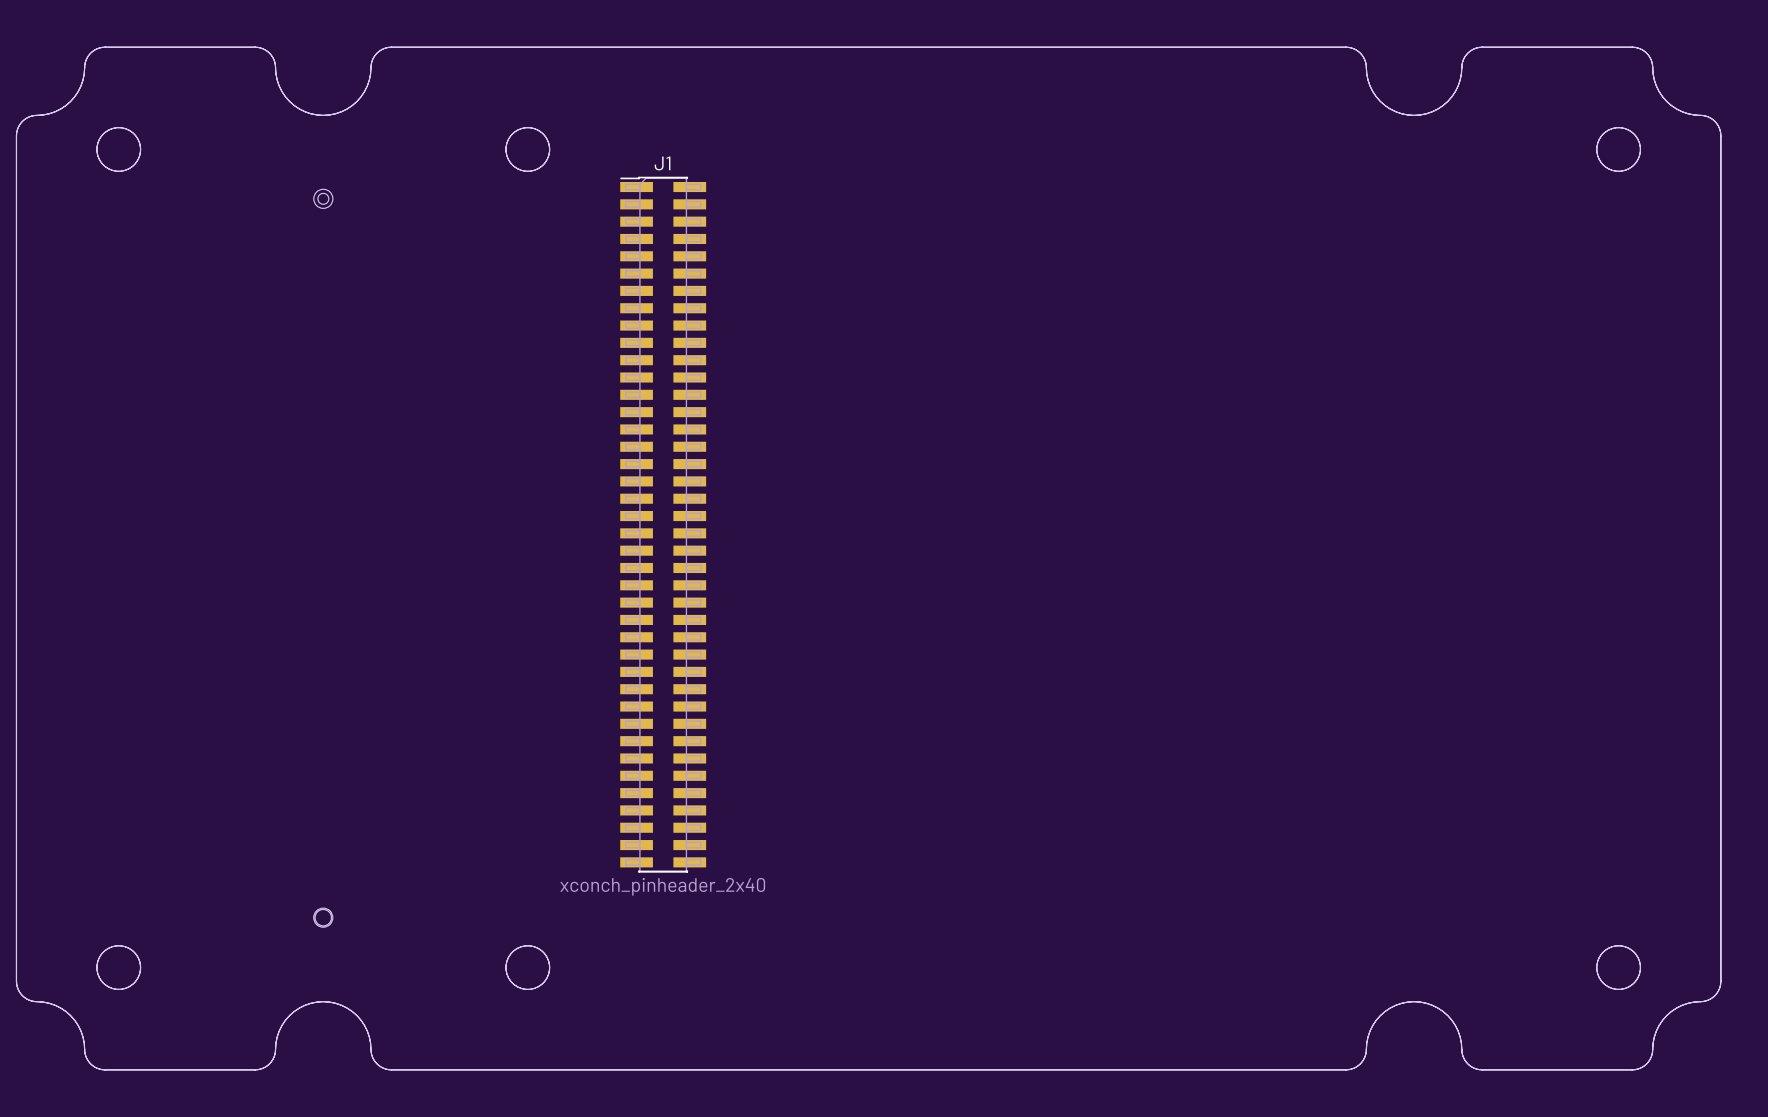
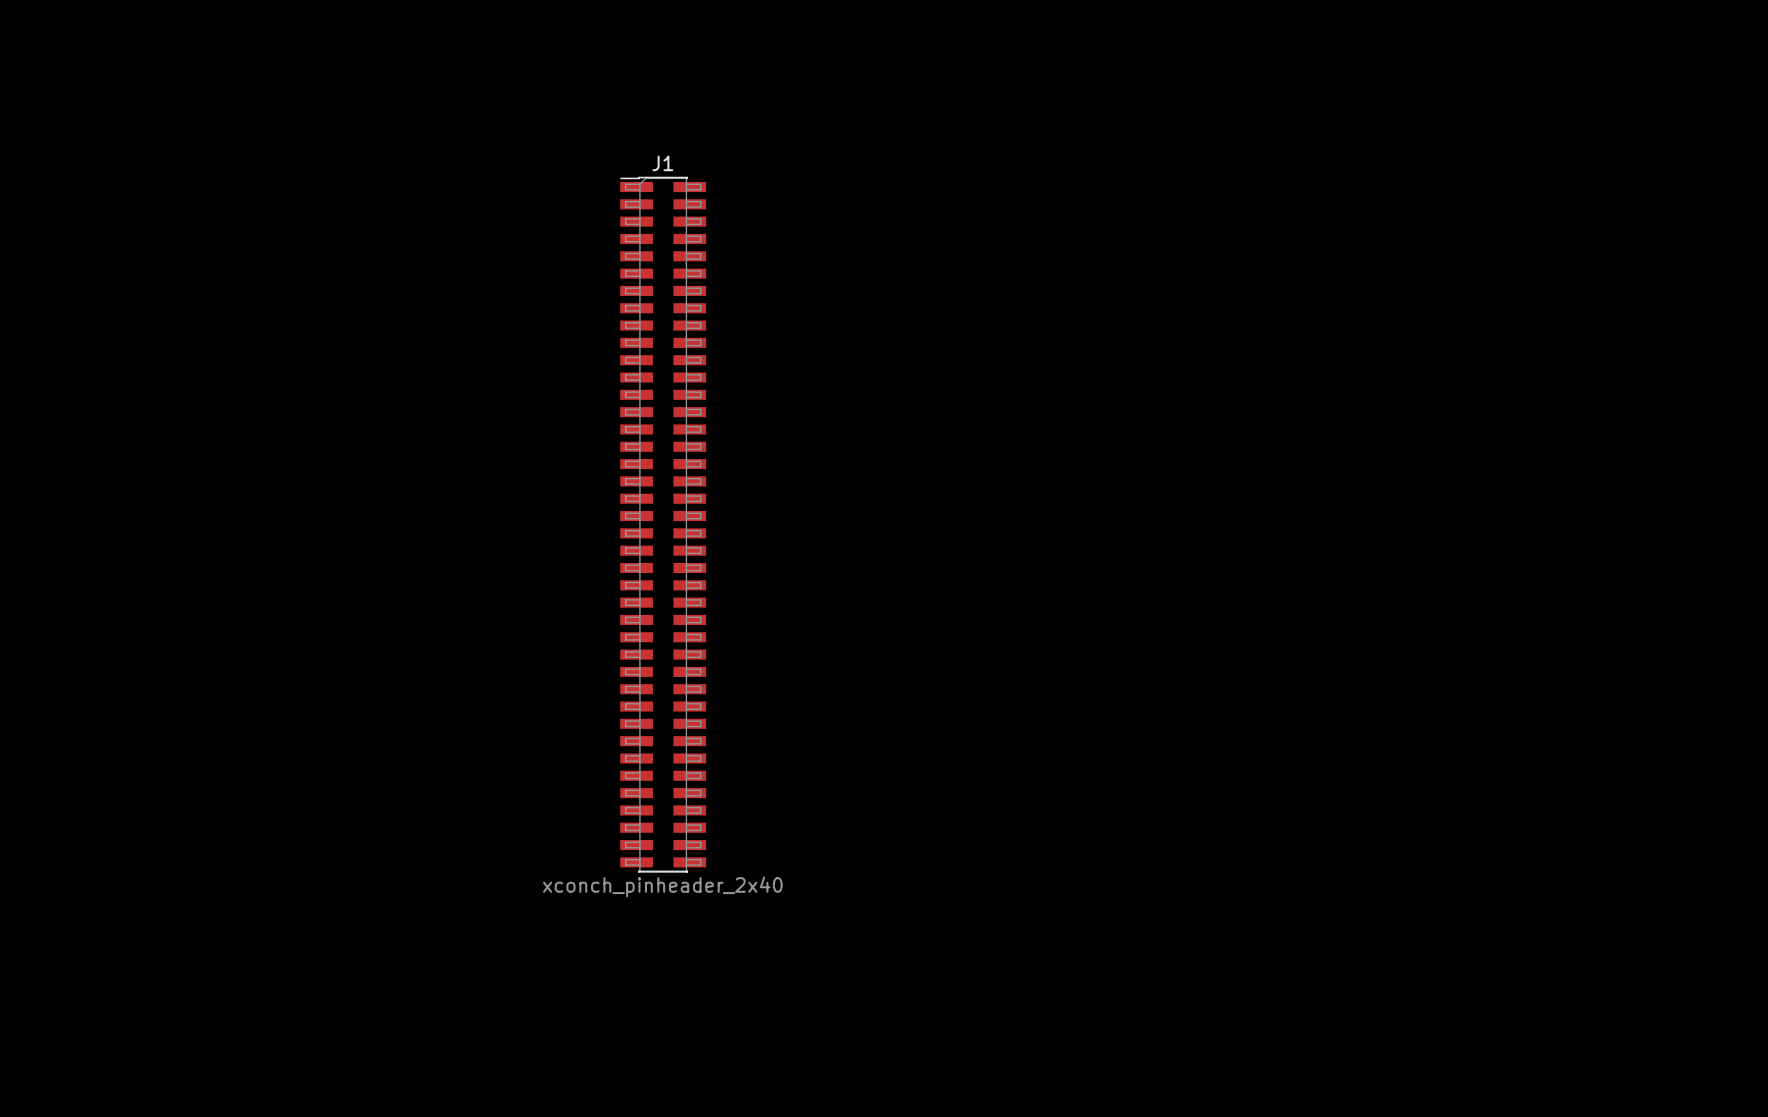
board edge: (105, 47) (255, 47) -> none
board edge: (105, 47) (97, 48) (90, 53) (86, 59) (84, 67) -> none
board edge: (105, 47) (97, 48) (90, 53) (86, 59) (84, 67) -> none
board edge: (255, 47) (262, 48) (269, 53) (273, 59) (275, 67) -> none
board edge: (255, 47) (262, 48) (269, 53) (273, 59) (275, 67) -> none
board edge: (391, 47) (1345, 47) -> none
board edge: (391, 47) (383, 48) (376, 53) (372, 59) (370, 67) -> none
board edge: (391, 47) (383, 48) (376, 53) (372, 59) (370, 67) -> none
board edge: (1345, 47) (1353, 48) (1360, 53) (1364, 59) (1366, 67) -> none
board edge: (1345, 47) (1353, 48) (1360, 53) (1364, 59) (1366, 67) -> none
board edge: (1482, 47) (1632, 47) -> none
board edge: (1482, 47) (1474, 48) (1467, 53) (1463, 59) (1461, 67) -> none
board edge: (1482, 47) (1474, 48) (1467, 53) (1463, 59) (1461, 67) -> none
board edge: (1632, 47) (1640, 48) (1646, 53) (1651, 59) (1652, 67) -> none
board edge: (1632, 47) (1640, 48) (1646, 53) (1651, 59) (1652, 67) -> none
board edge: (84, 67) (81, 85) (70, 101) (55, 111) (36, 115) -> none
board edge: (84, 67) (81, 85) (70, 101) (55, 111) (36, 115) -> none
board edge: (275, 67) (279, 85) (289, 101) (305, 111) (323, 115) (341, 111) (357, 101) (367, 85) (370, 67) -> none
board edge: (275, 67) (279, 85) (289, 101) (305, 111) (323, 115) (341, 111) (357, 101) (367, 85) (370, 67) -> none
board edge: (1366, 67) (1369, 85) (1380, 101) (1395, 111) (1414, 115) (1432, 111) (1447, 101) (1458, 85) (1461, 67) -> none
board edge: (1366, 67) (1369, 85) (1380, 101) (1395, 111) (1414, 115) (1432, 111) (1447, 101) (1458, 85) (1461, 67) -> none
board edge: (1652, 67) (1656, 85) (1666, 101) (1682, 111) (1700, 115) -> none
board edge: (1652, 67) (1656, 85) (1666, 101) (1682, 111) (1700, 115) -> none
board edge: (36, 115) (29, 116) (22, 121) (18, 128) (16, 135) -> none
board edge: (36, 115) (29, 116) (22, 121) (18, 128) (16, 135) -> none
board edge: (1700, 115) (1708, 116) (1714, 121) (1719, 128) (1720, 135) -> none
board edge: (1700, 115) (1708, 116) (1714, 121) (1719, 128) (1720, 135) -> none
round board edge: [96, 127, 141, 172] -> none
round board edge: [505, 127, 550, 172] -> none
round board edge: [1596, 127, 1641, 172] -> none
board edge: (16, 135) (16, 981) -> none
board edge: (1720, 135) (1720, 981) -> none
round board edge: [313, 189, 333, 209] -> none
round board edge: [317, 193, 329, 205] -> none
round board edge: [313, 908, 333, 928] -> none
round board edge: [315, 909, 332, 926] -> none
round board edge: [96, 945, 141, 990] -> none
round board edge: [505, 945, 550, 990] -> none
round board edge: [1596, 945, 1641, 990] -> none
board edge: (16, 981) (18, 989) (22, 995) (29, 1000) (36, 1001) -> none
board edge: (16, 981) (18, 989) (22, 995) (29, 1000) (36, 1001) -> none
board edge: (1720, 981) (1719, 989) (1714, 995) (1708, 1000) (1700, 1001) -> none
board edge: (1720, 981) (1719, 989) (1714, 995) (1708, 1000) (1700, 1001) -> none
board edge: (36, 1001) (55, 1005) (70, 1015) (81, 1031) (84, 1049) -> none
board edge: (36, 1001) (55, 1005) (70, 1015) (81, 1031) (84, 1049) -> none
board edge: (1700, 1001) (1682, 1005) (1666, 1015) (1656, 1031) (1652, 1049) -> none
board edge: (1700, 1001) (1682, 1005) (1666, 1015) (1656, 1031) (1652, 1049) -> none
board edge: (84, 1049) (86, 1057) (90, 1063) (97, 1068) (105, 1069) -> none
board edge: (84, 1049) (86, 1057) (90, 1063) (97, 1068) (105, 1069) -> none
board edge: (275, 1049) (273, 1057) (269, 1063) (262, 1068) (255, 1069) -> none
board edge: (275, 1049) (279, 1031) (289, 1015) (305, 1005) (323, 1001) (341, 1005) (357, 1015) (367, 1031) (370, 1049) -> none
board edge: (275, 1049) (273, 1057) (269, 1063) (262, 1068) (255, 1069) -> none
board edge: (275, 1049) (279, 1031) (289, 1015) (305, 1005) (323, 1001) (341, 1005) (357, 1015) (367, 1031) (370, 1049) -> none
board edge: (370, 1049) (372, 1057) (376, 1063) (383, 1068) (391, 1069) -> none
board edge: (370, 1049) (372, 1057) (376, 1063) (383, 1068) (391, 1069) -> none
board edge: (1366, 1049) (1364, 1057) (1360, 1063) (1353, 1068) (1345, 1069) -> none
board edge: (1366, 1049) (1369, 1031) (1380, 1015) (1395, 1005) (1414, 1001) (1432, 1005) (1447, 1015) (1458, 1031) (1461, 1049) -> none
board edge: (1366, 1049) (1369, 1031) (1380, 1015) (1395, 1005) (1414, 1001) (1432, 1005) (1447, 1015) (1458, 1031) (1461, 1049) -> none
board edge: (1366, 1049) (1364, 1057) (1360, 1063) (1353, 1068) (1345, 1069) -> none
board edge: (1461, 1049) (1463, 1057) (1467, 1063) (1474, 1068) (1482, 1069) -> none
board edge: (1461, 1049) (1463, 1057) (1467, 1063) (1474, 1068) (1482, 1069) -> none
board edge: (1652, 1049) (1651, 1057) (1646, 1063) (1640, 1068) (1632, 1069) -> none
board edge: (1652, 1049) (1651, 1057) (1646, 1063) (1640, 1068) (1632, 1069) -> none
board edge: (105, 1069) (255, 1069) -> none
board edge: (391, 1069) (1345, 1069) -> none
board edge: (1482, 1069) (1632, 1069) -> none

